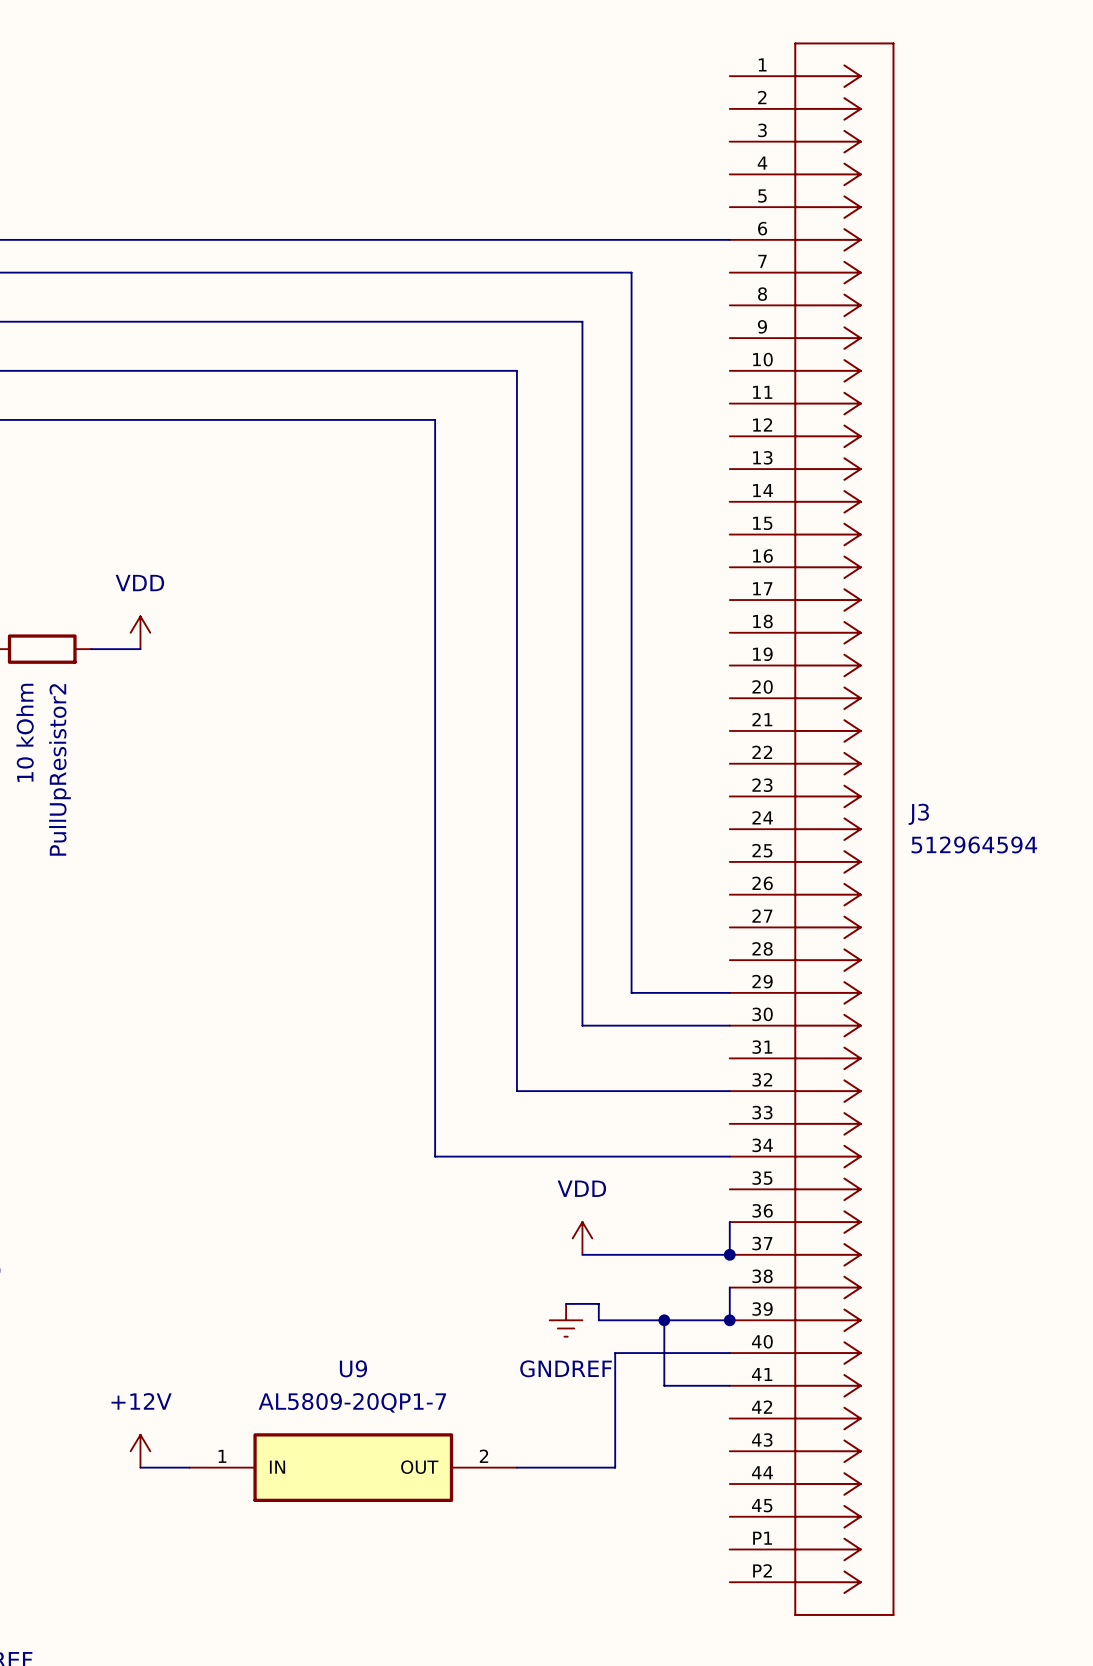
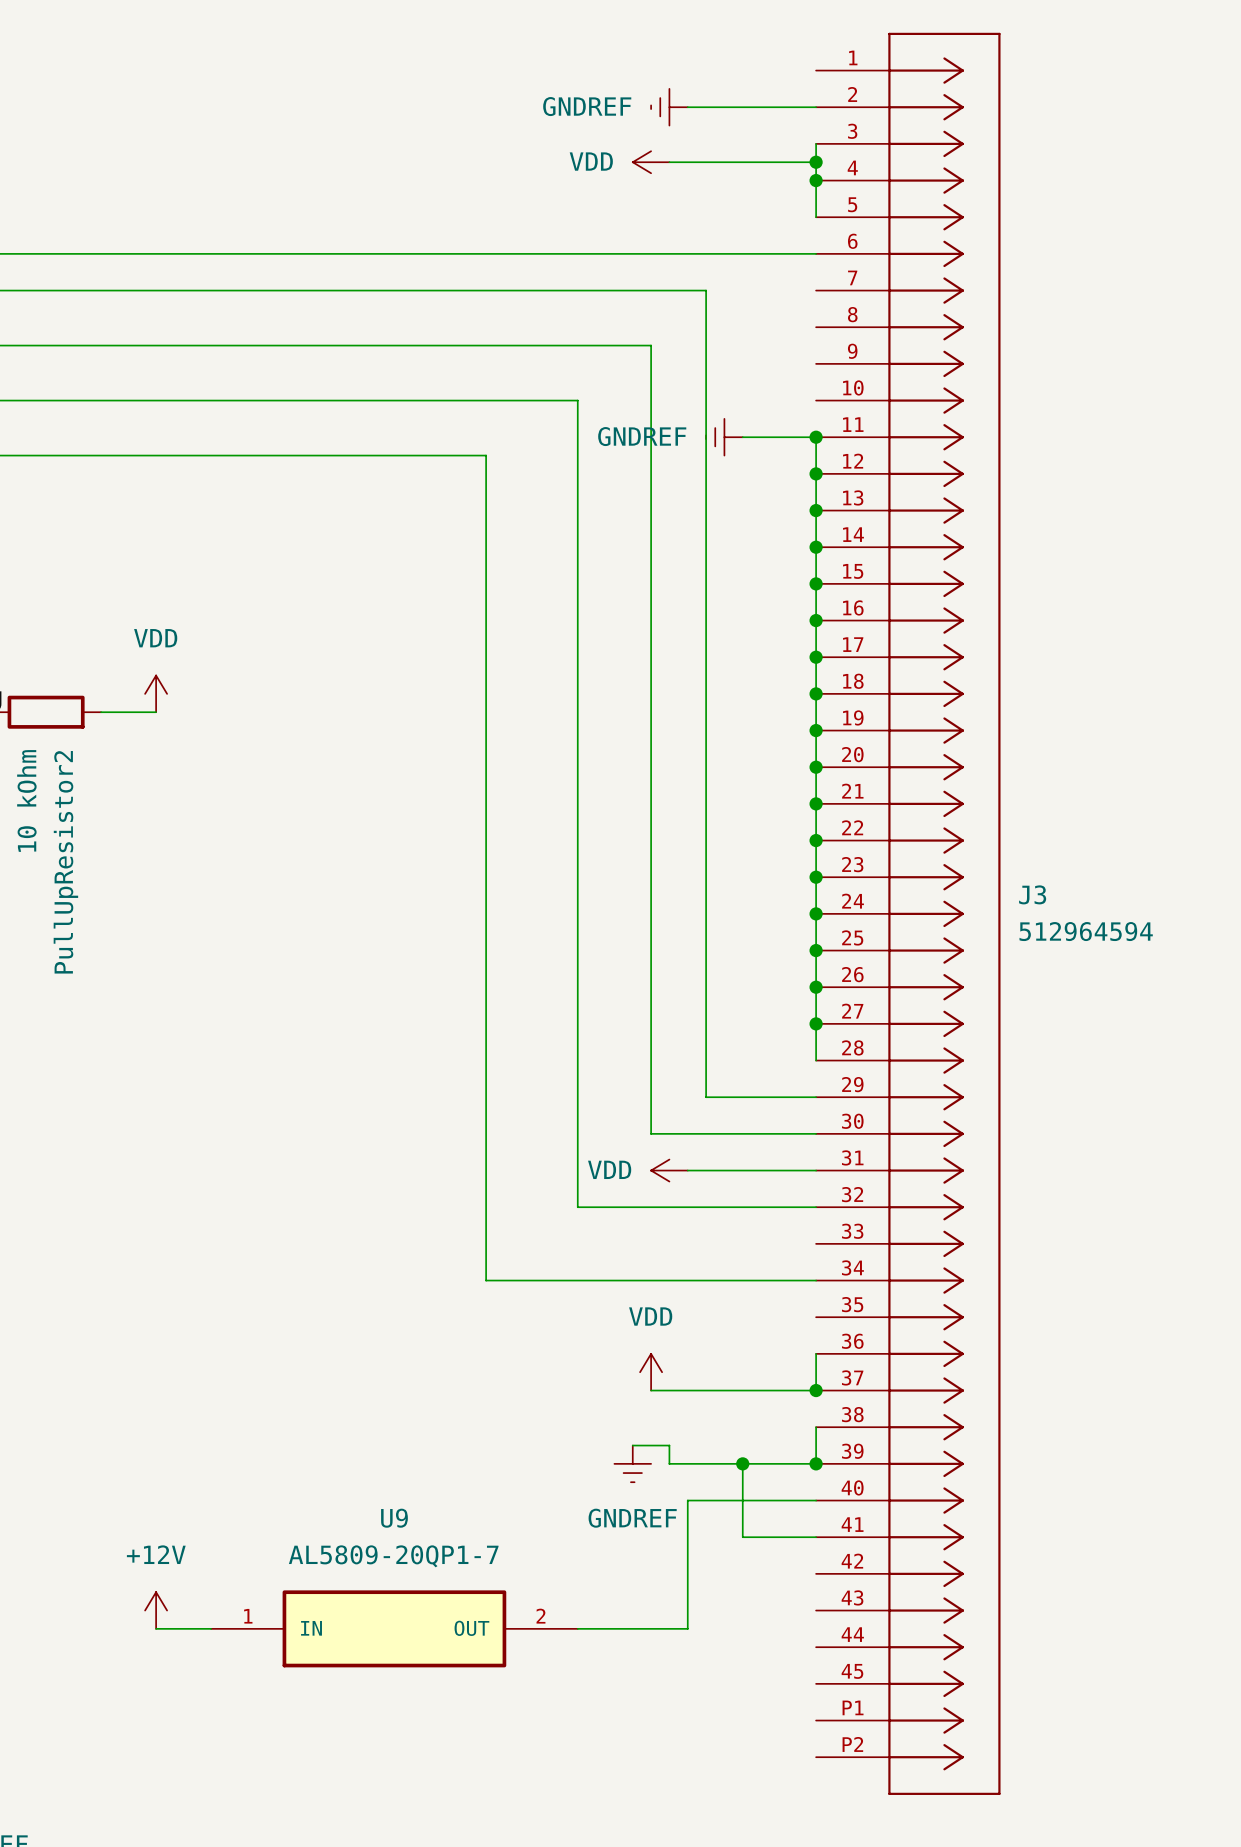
power symbol: none -> GNDREF (669, 107)
wire: none -> (687, 107) (816, 107)
wire: none -> (816, 143) (816, 217)
power symbol: none -> VDD (651, 162)
wire: none -> (669, 162) (816, 162)
junction: none -> (816, 162)
junction: none -> (816, 180)
power symbol: none -> GNDREF (724, 437)
wire: none -> (742, 437) (816, 437) (816, 1060)
junction: none -> (816, 437)
junction: none -> (816, 473)
junction: none -> (816, 510)
junction: none -> (816, 547)
junction: none -> (816, 583)
junction: none -> (816, 620)
junction: none -> (816, 657)
junction: none -> (816, 693)
junction: none -> (816, 730)
junction: none -> (816, 767)
junction: none -> (816, 803)
junction: none -> (816, 840)
junction: none -> (816, 877)
junction: none -> (816, 913)
junction: none -> (816, 950)
junction: none -> (816, 987)
junction: none -> (816, 1023)
power symbol: none -> VDD (669, 1170)
wire: none -> (687, 1170) (816, 1170)

